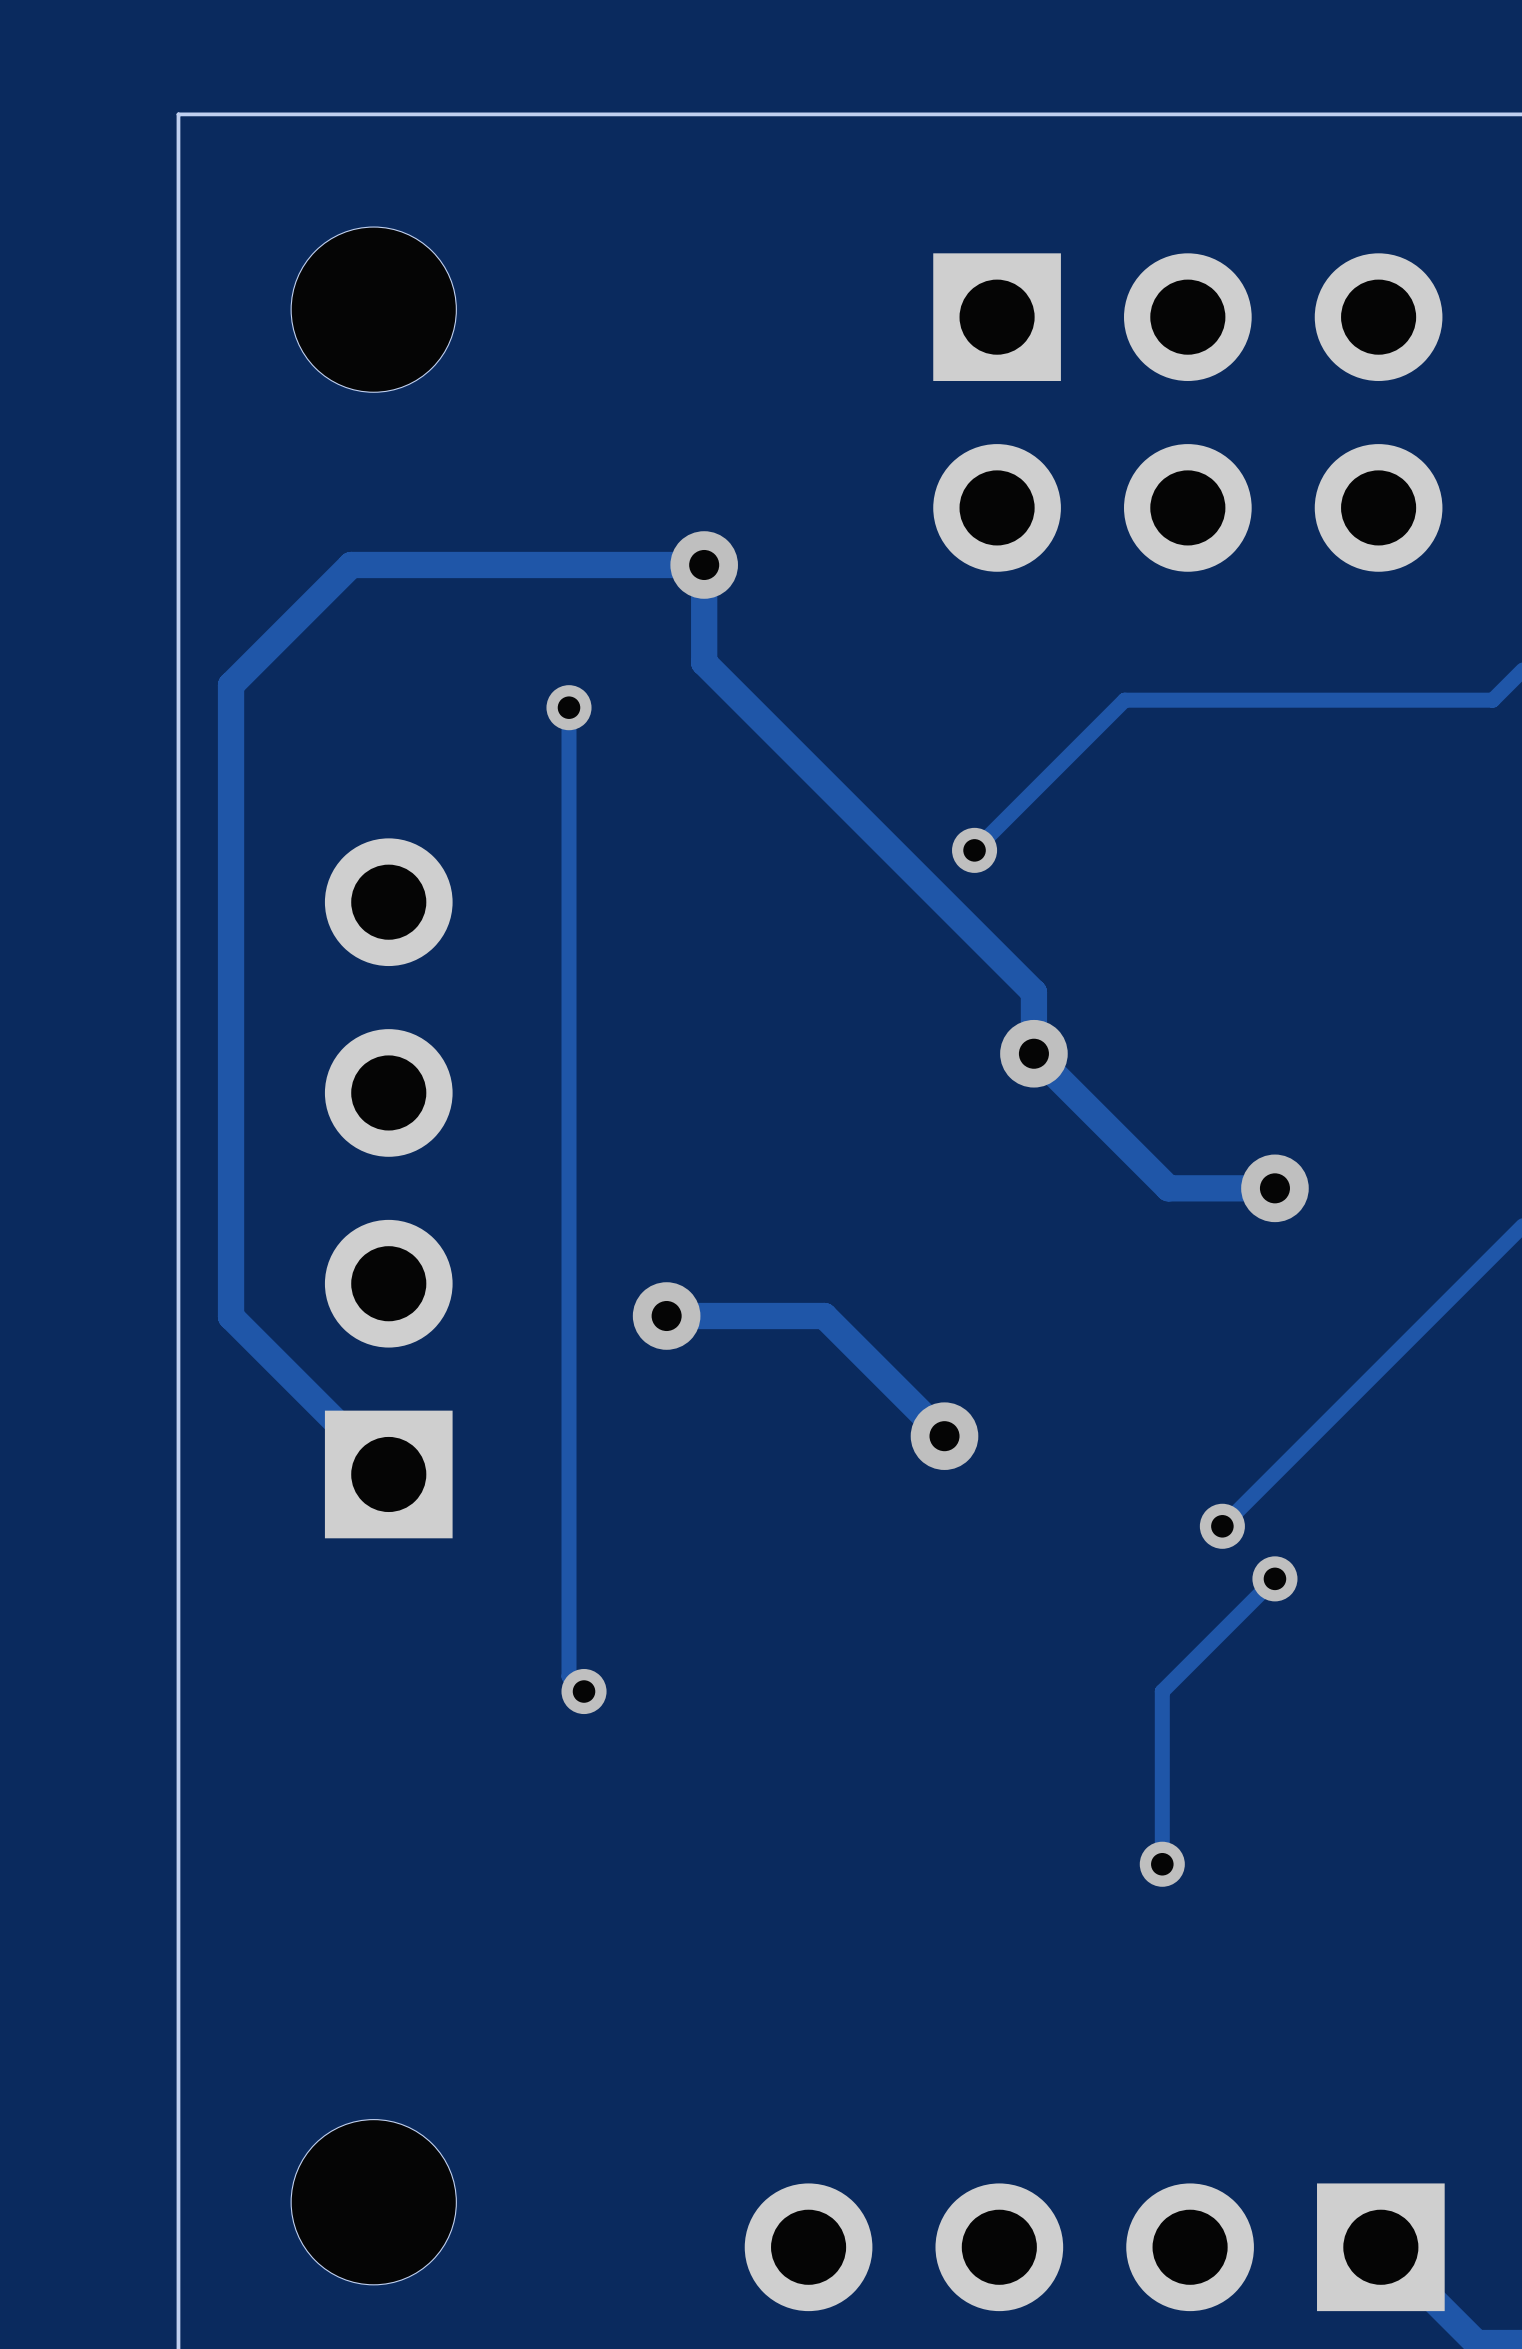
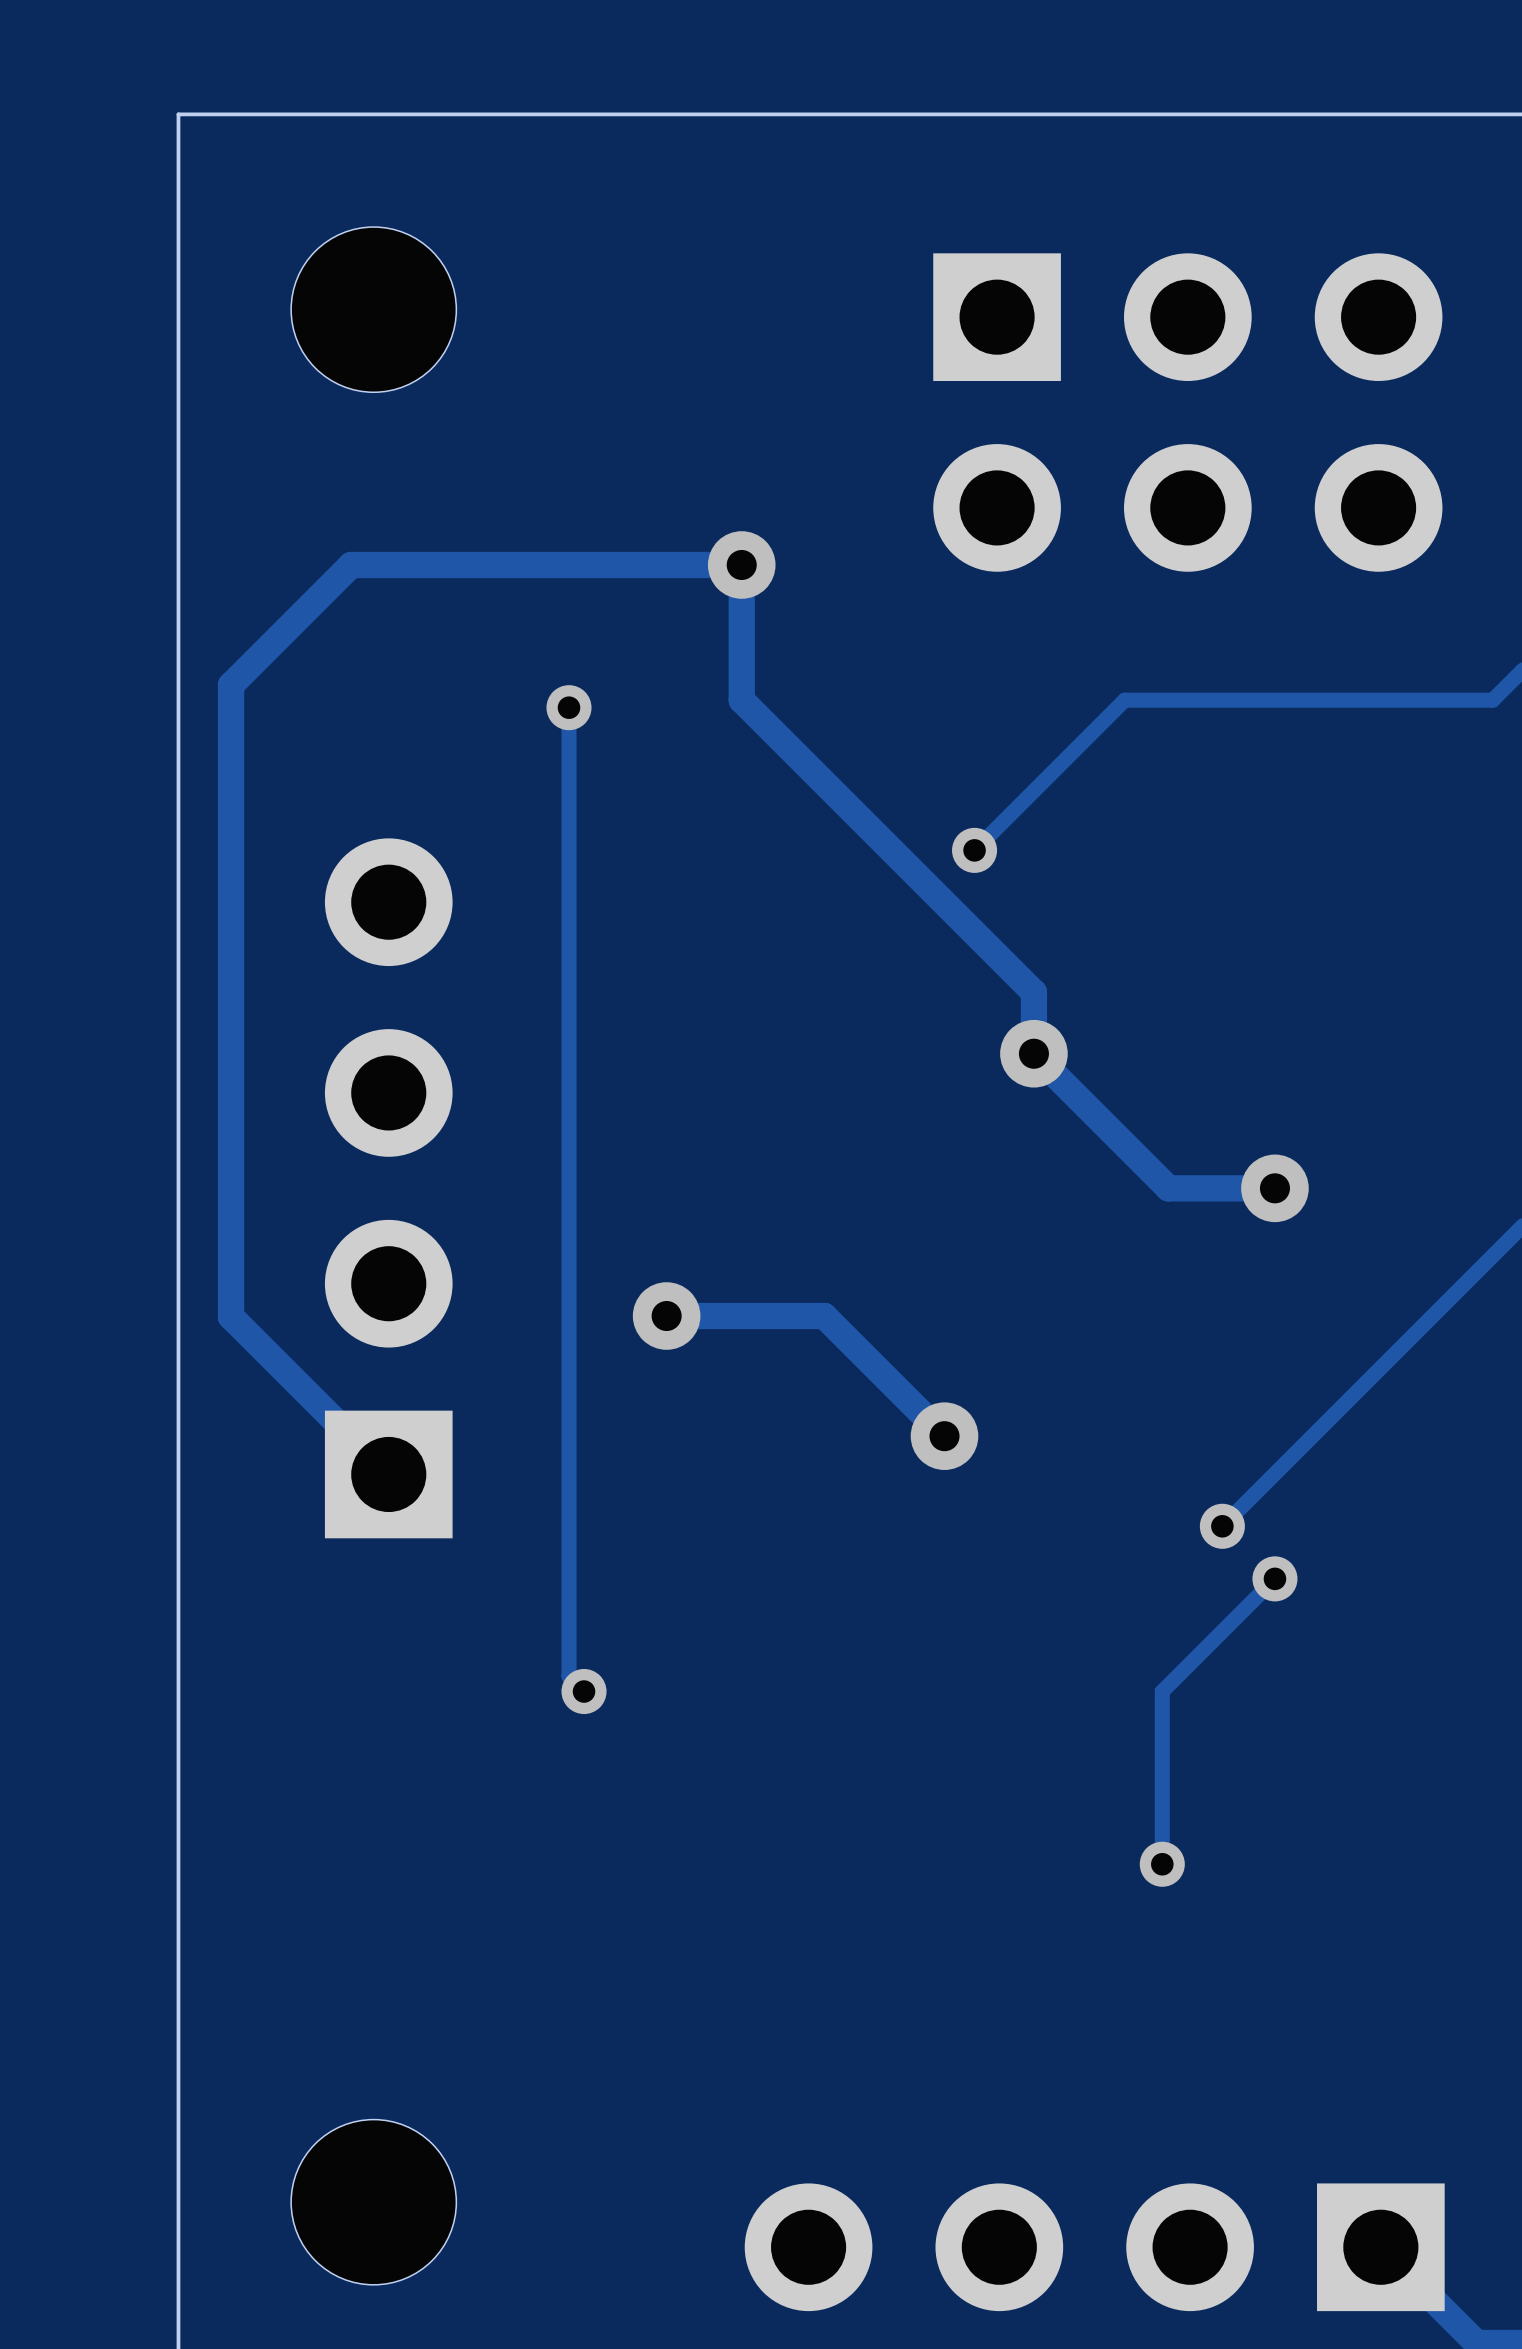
track: (704, 564) (704, 662) (741, 700) -> (704, 564) (741, 564) (741, 700)
via position: (704, 564) -> (741, 564)

